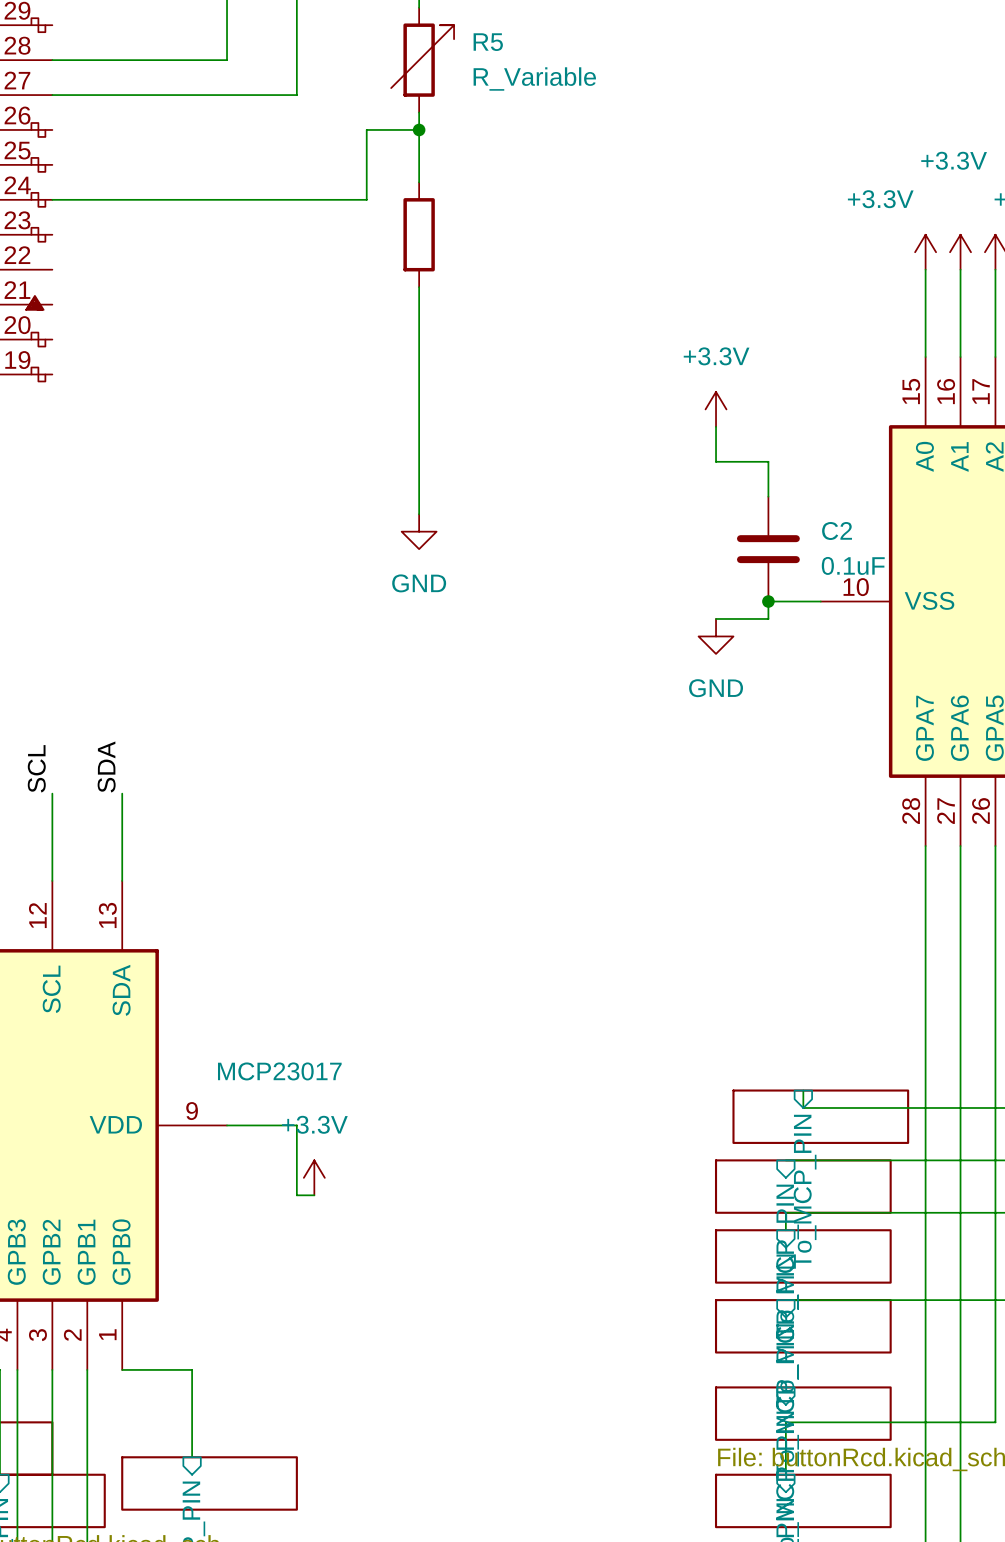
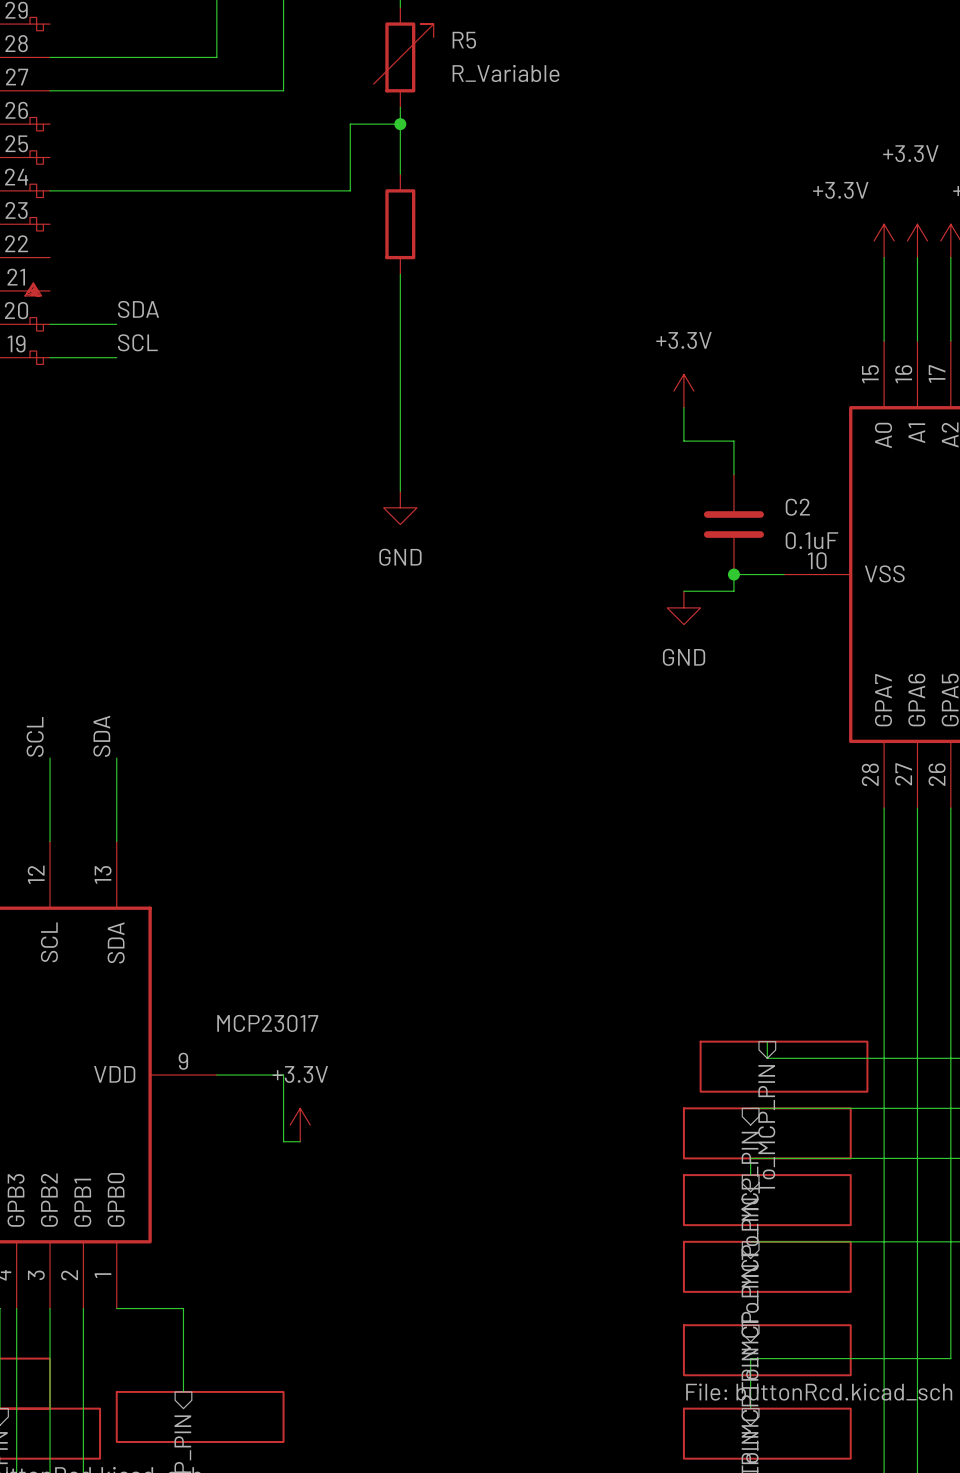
label: none -> SDA (138, 309)
wire: none -> (50, 324) (116, 324)
label: none -> SCL (137, 342)
wire: none -> (50, 357) (116, 357)

